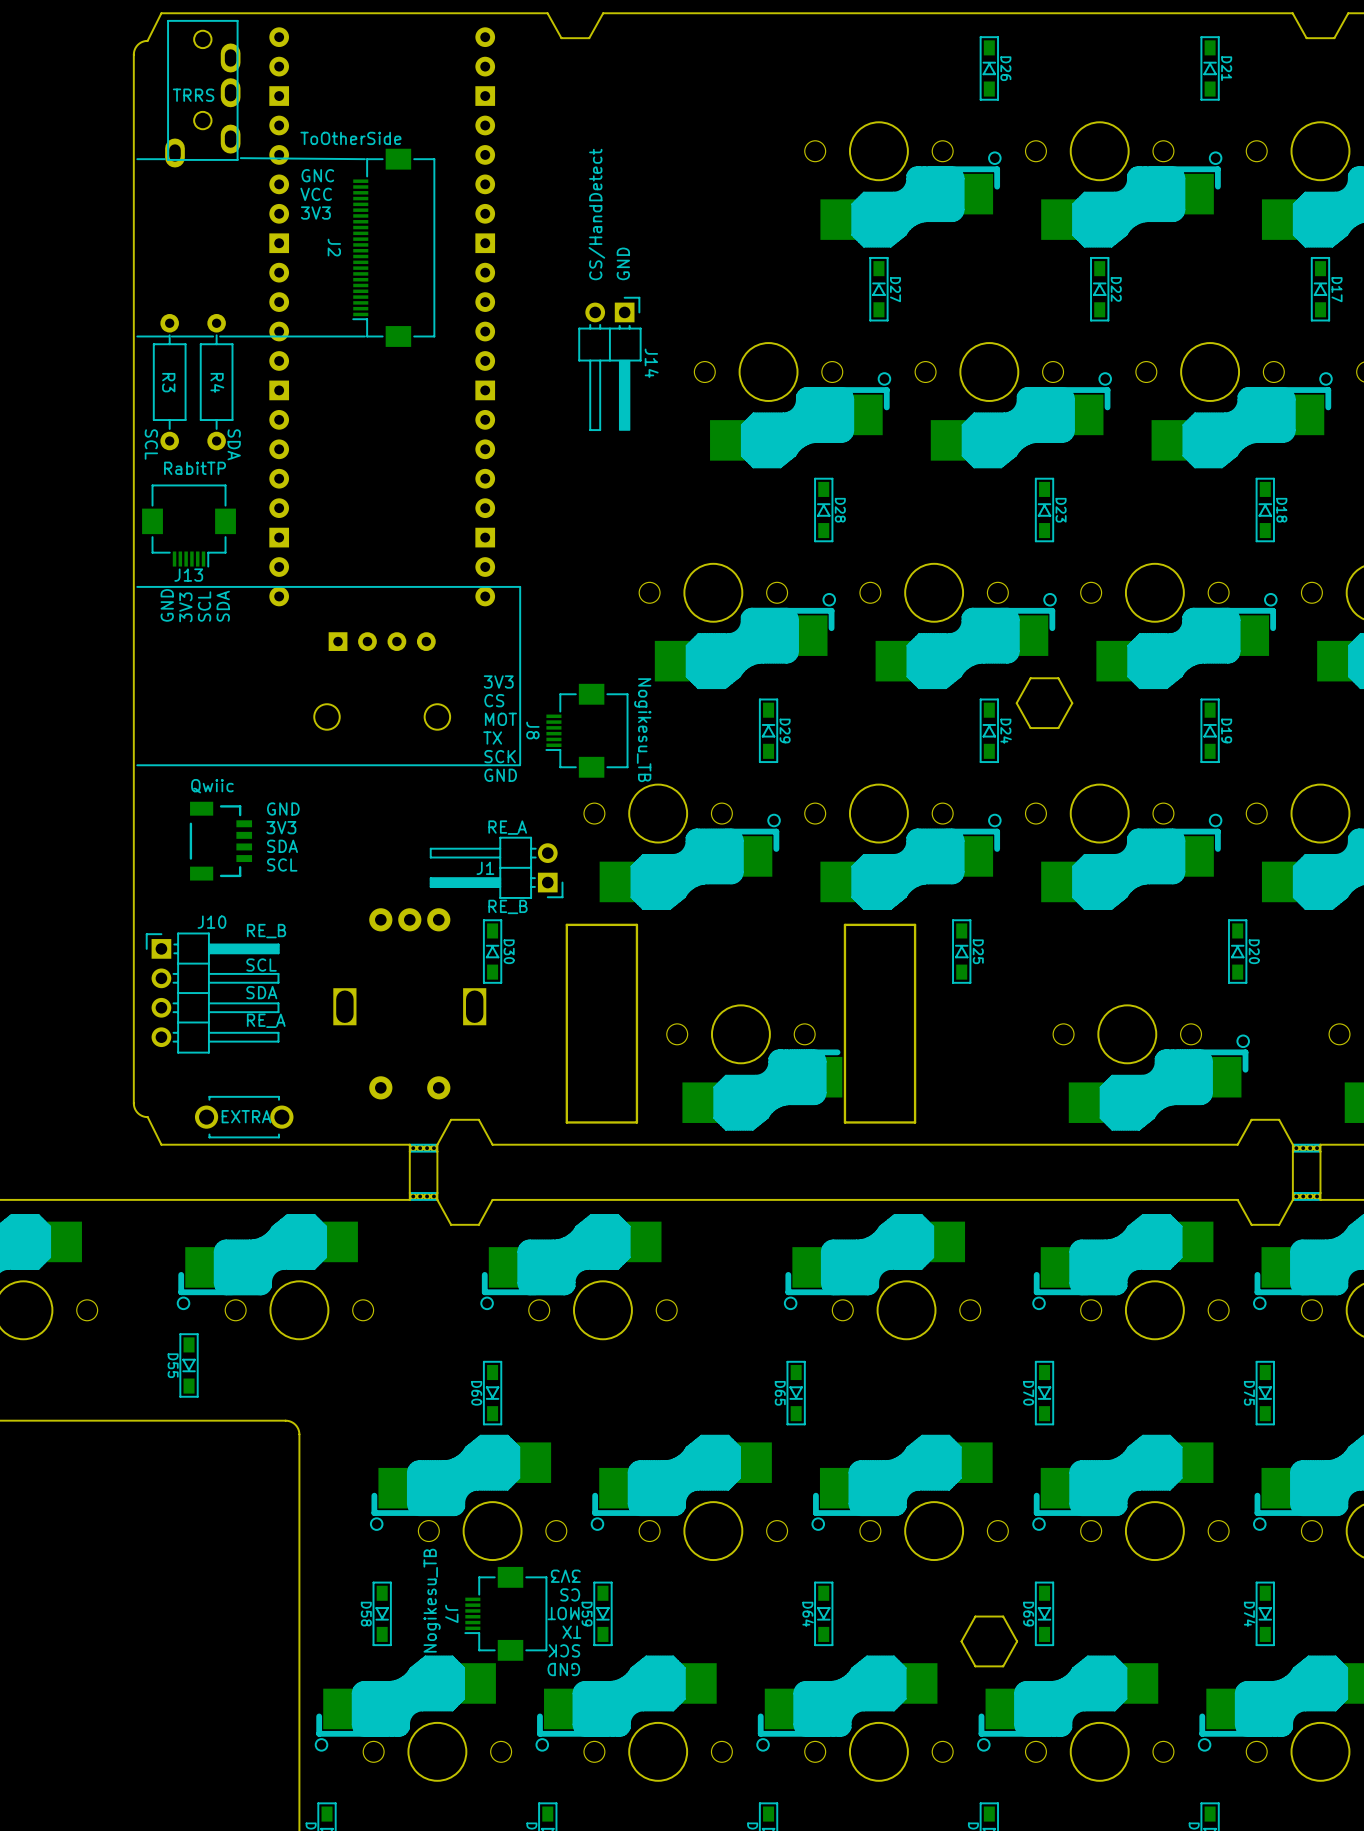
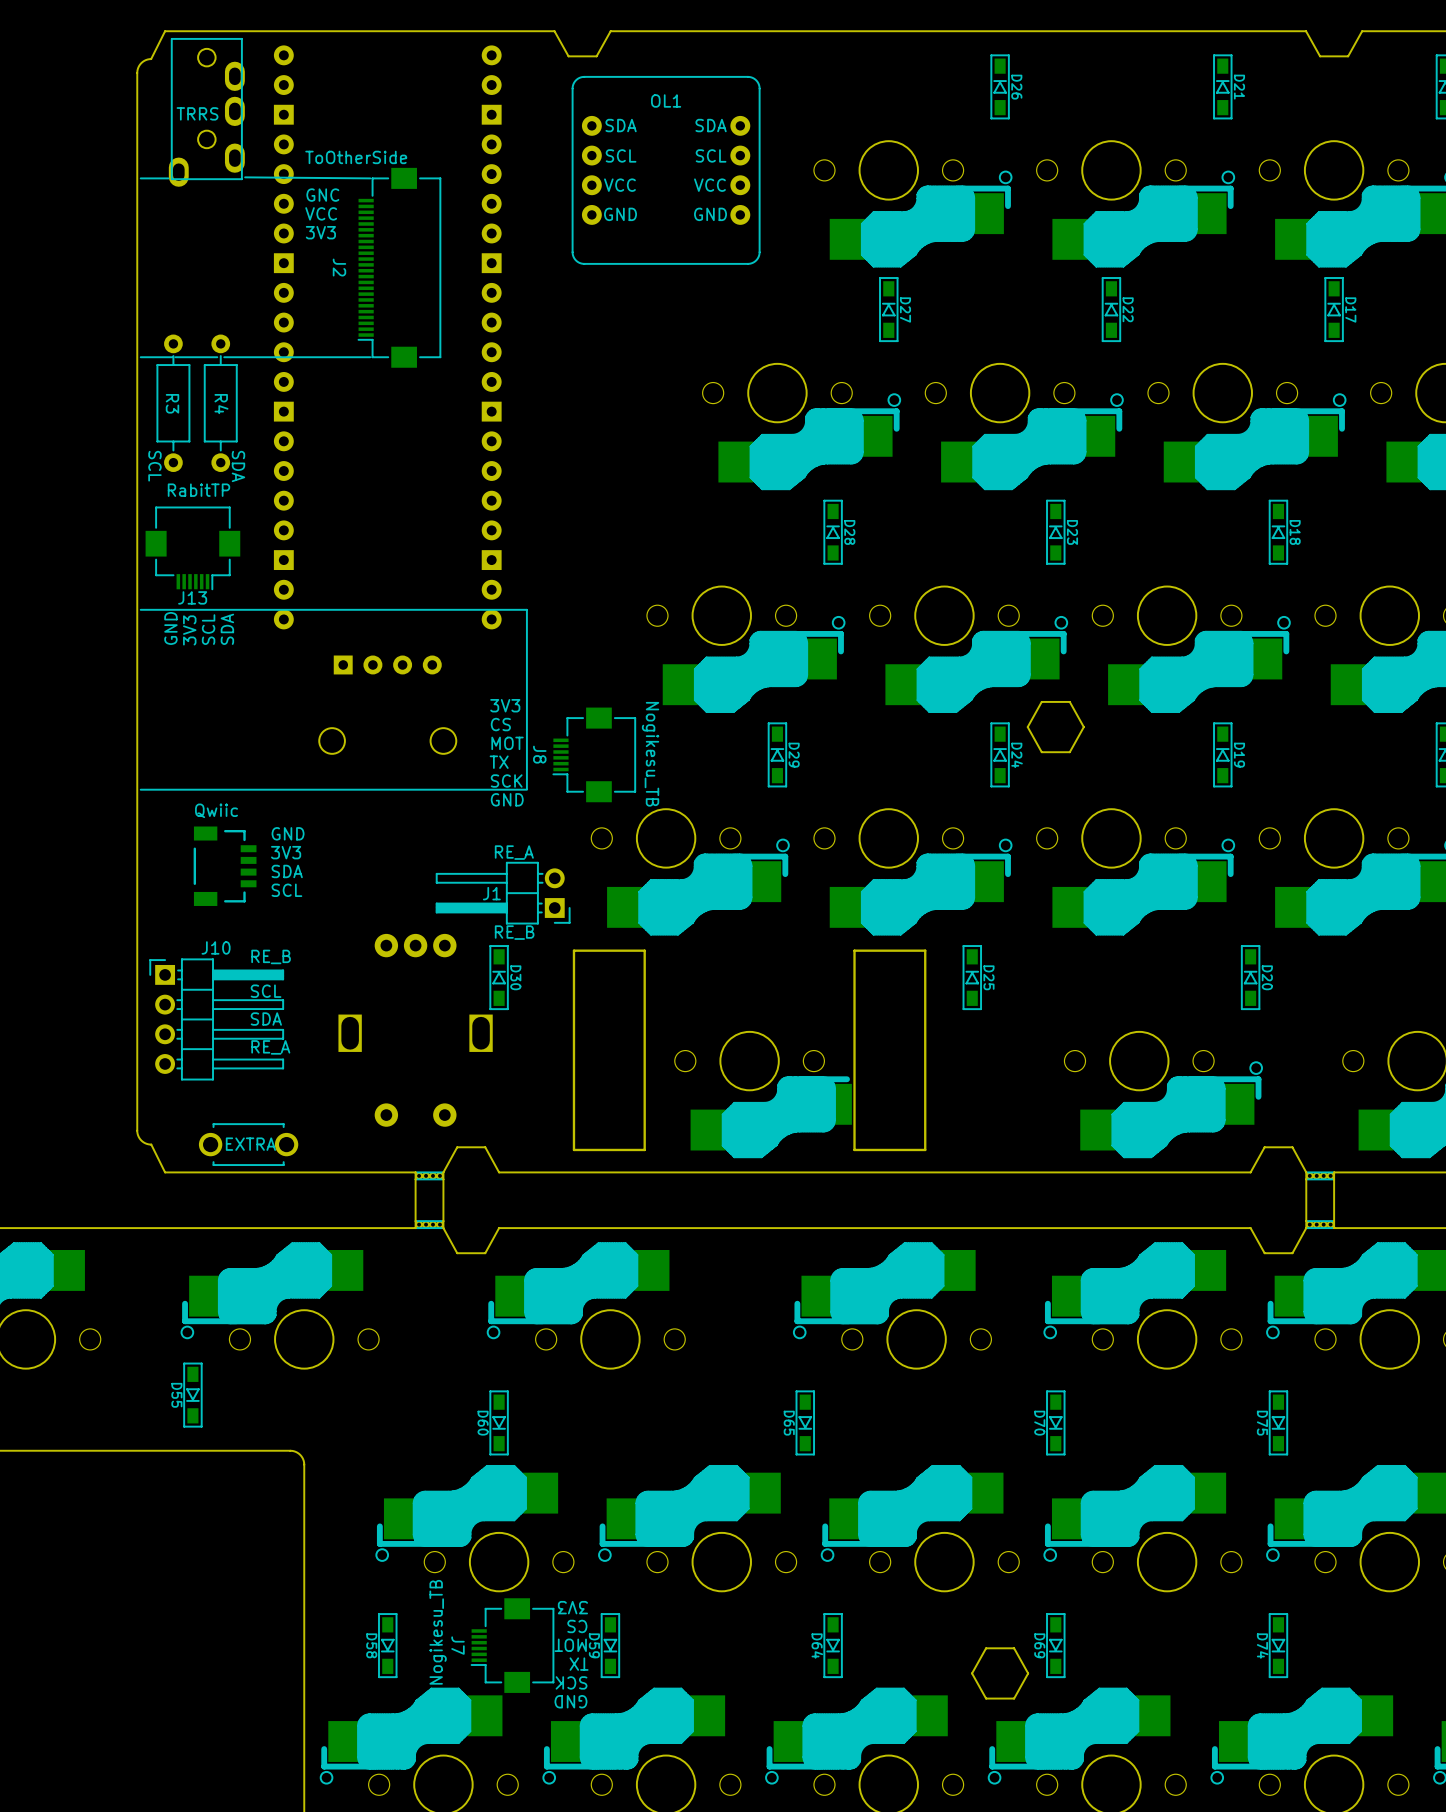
OL1: none -> (666, 170)
text: CS/HandDetect (596, 214) -> none
text: GND (623, 263) -> none
J14: (609, 363) -> none

